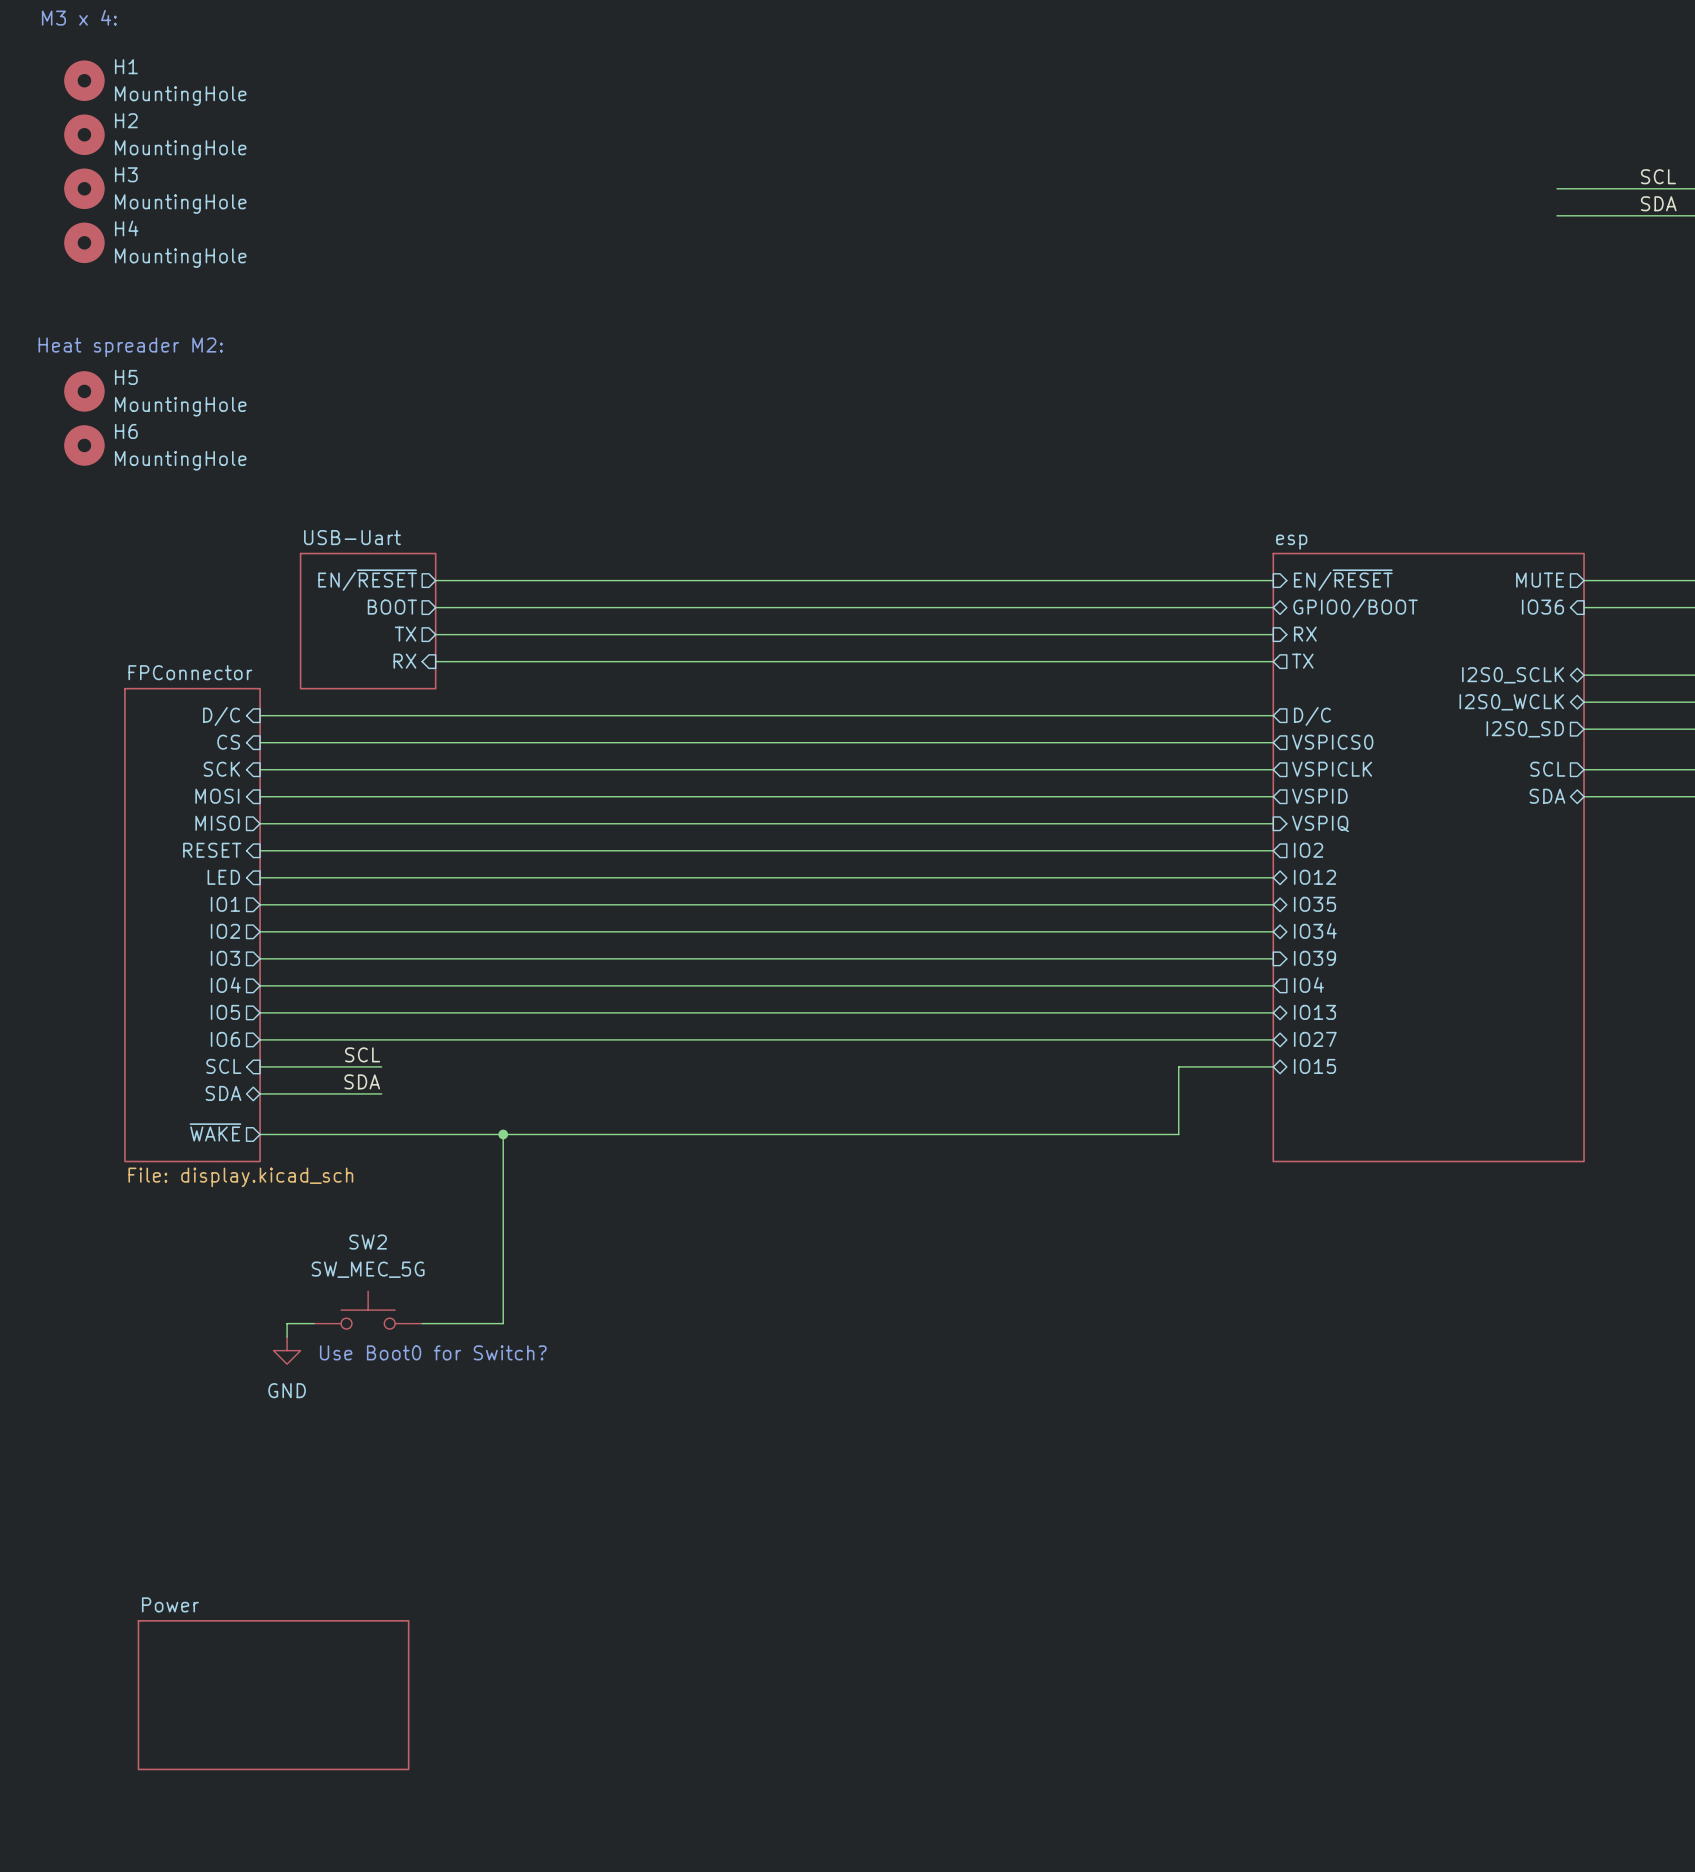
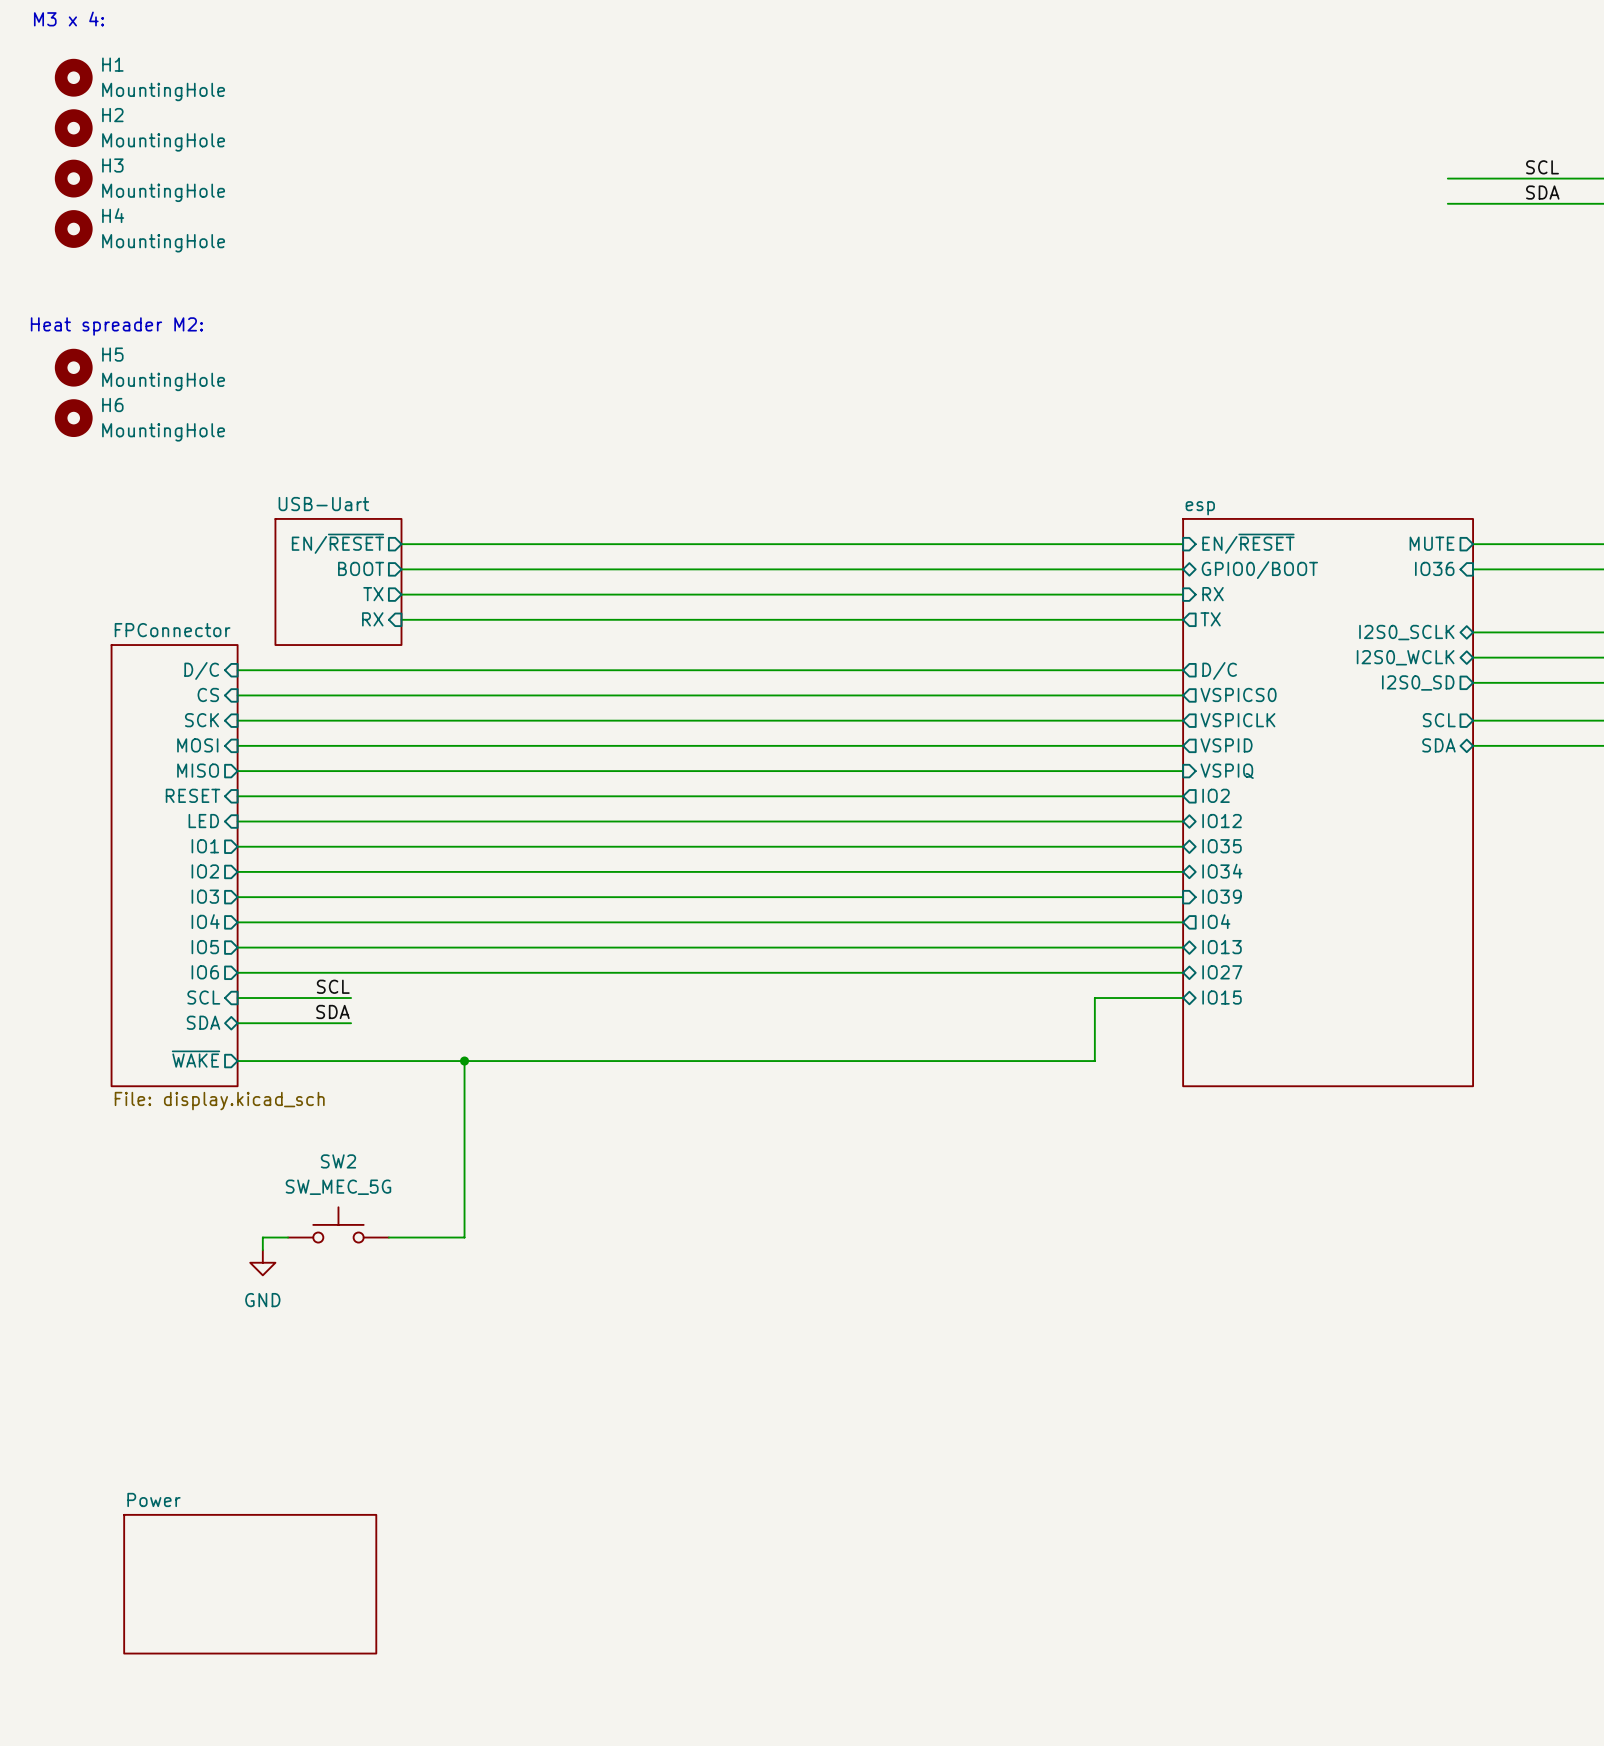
text: Use Boot0 for Switch? (433, 1352) -> none

